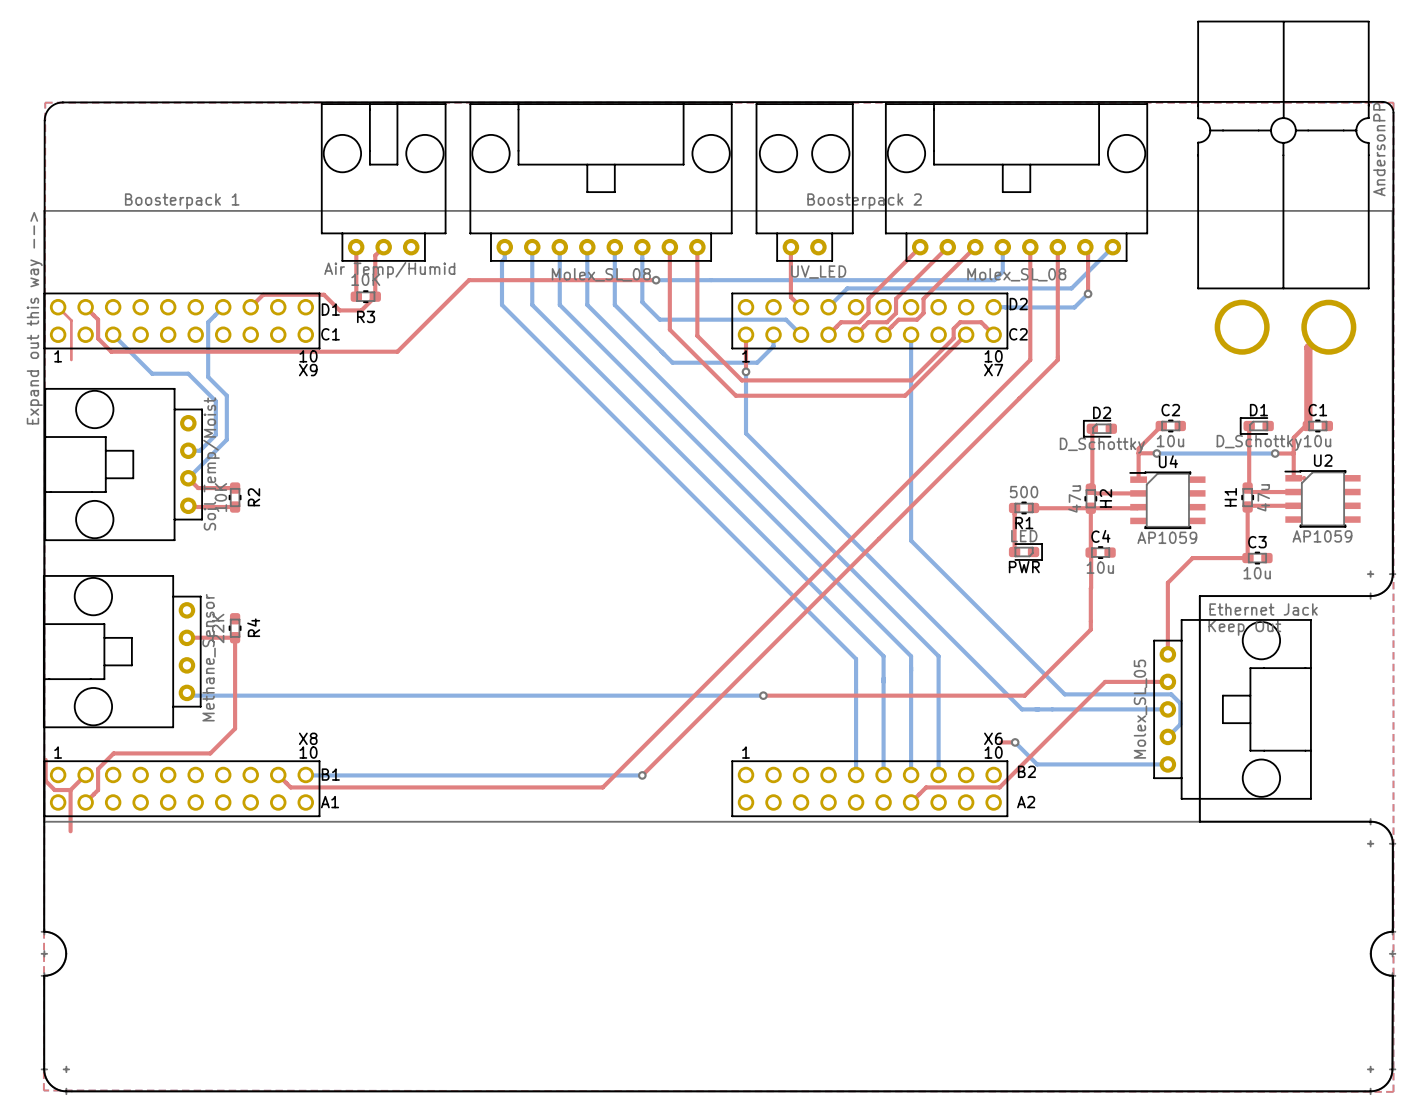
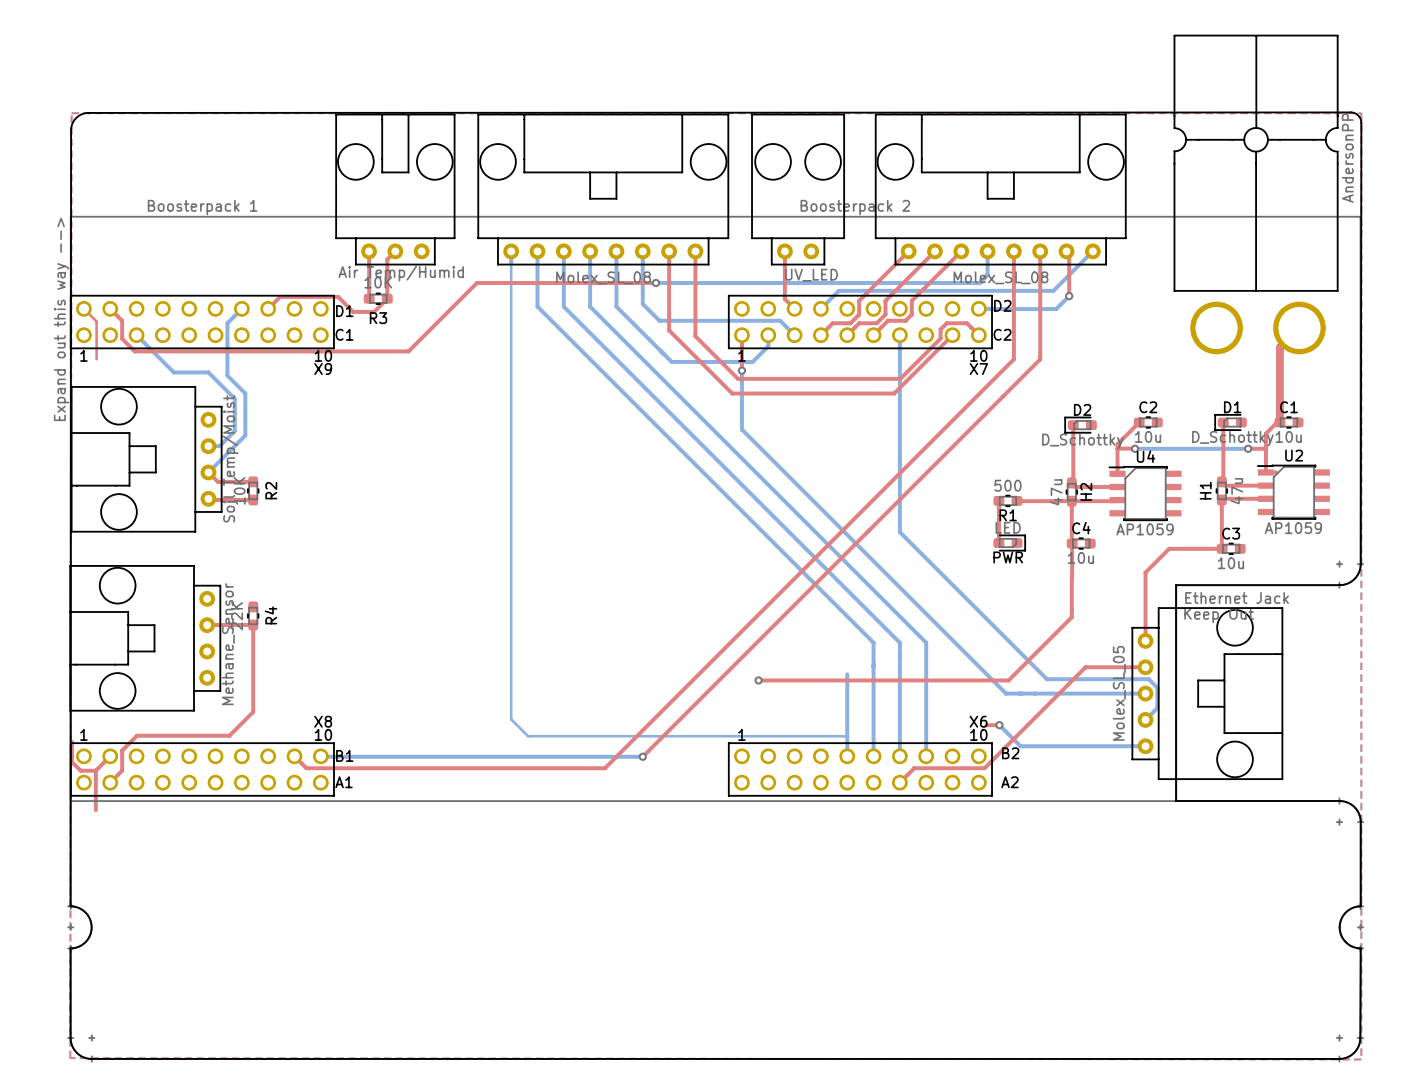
bottom track: (504, 258) (501, 261) (501, 304) (856, 659) (856, 689) -> (511, 262) (511, 719) (528, 736) (847, 736)
bottom track: (189, 695) (763, 695) -> none

